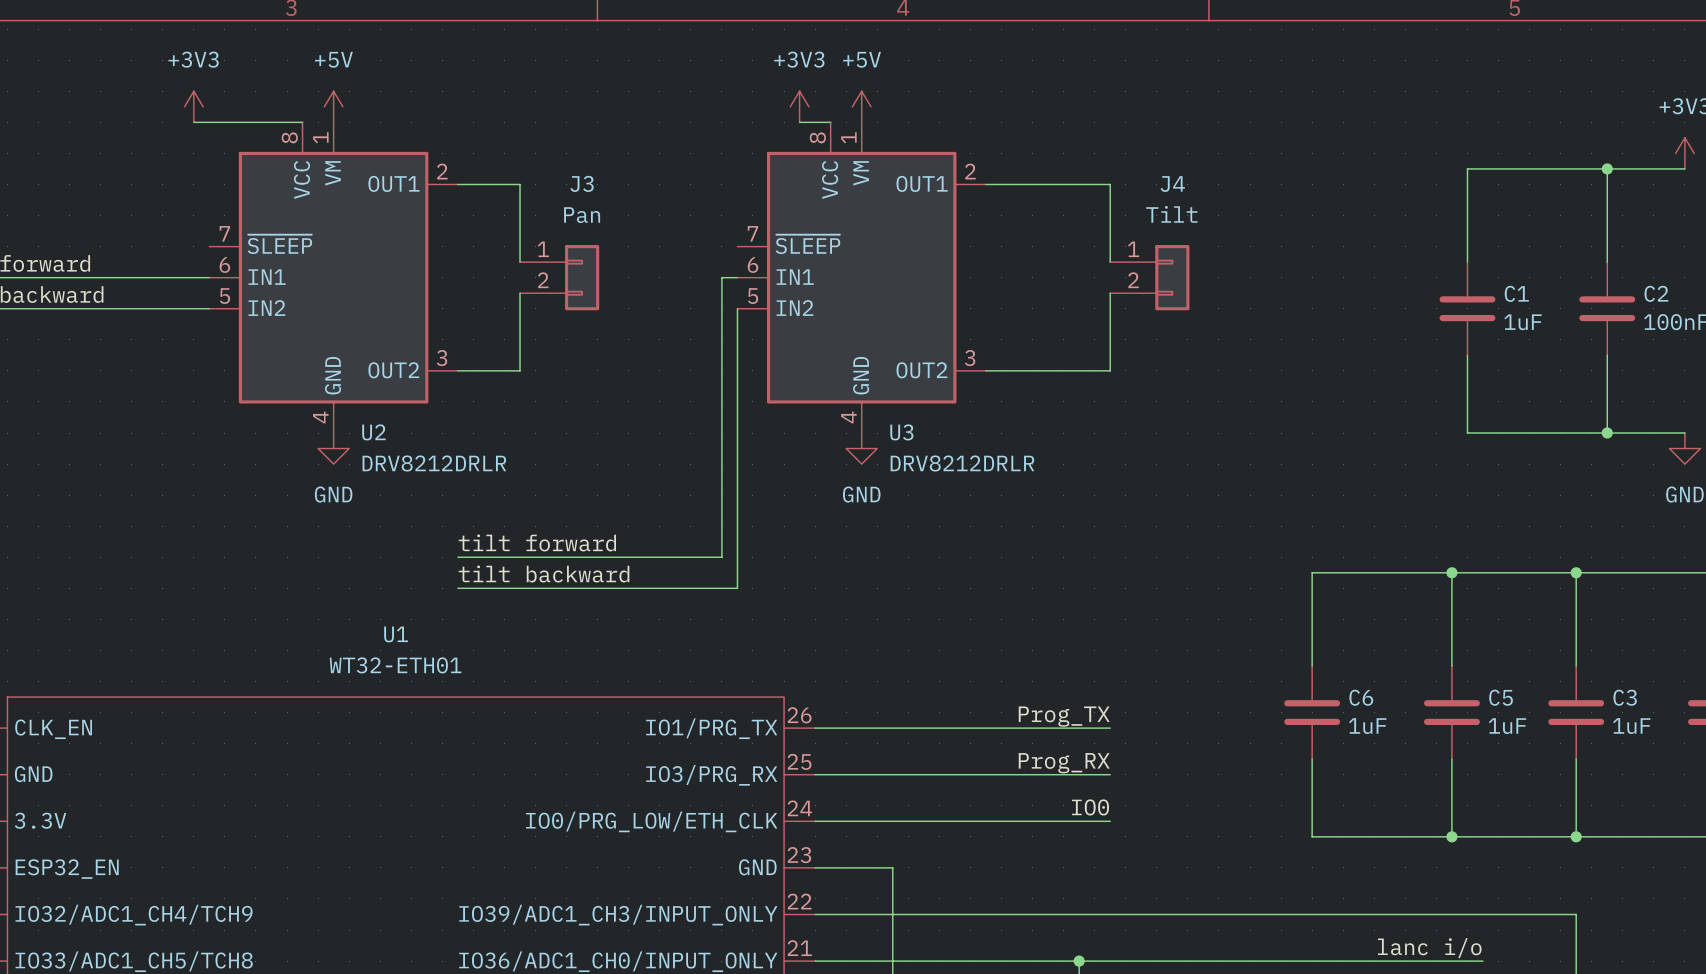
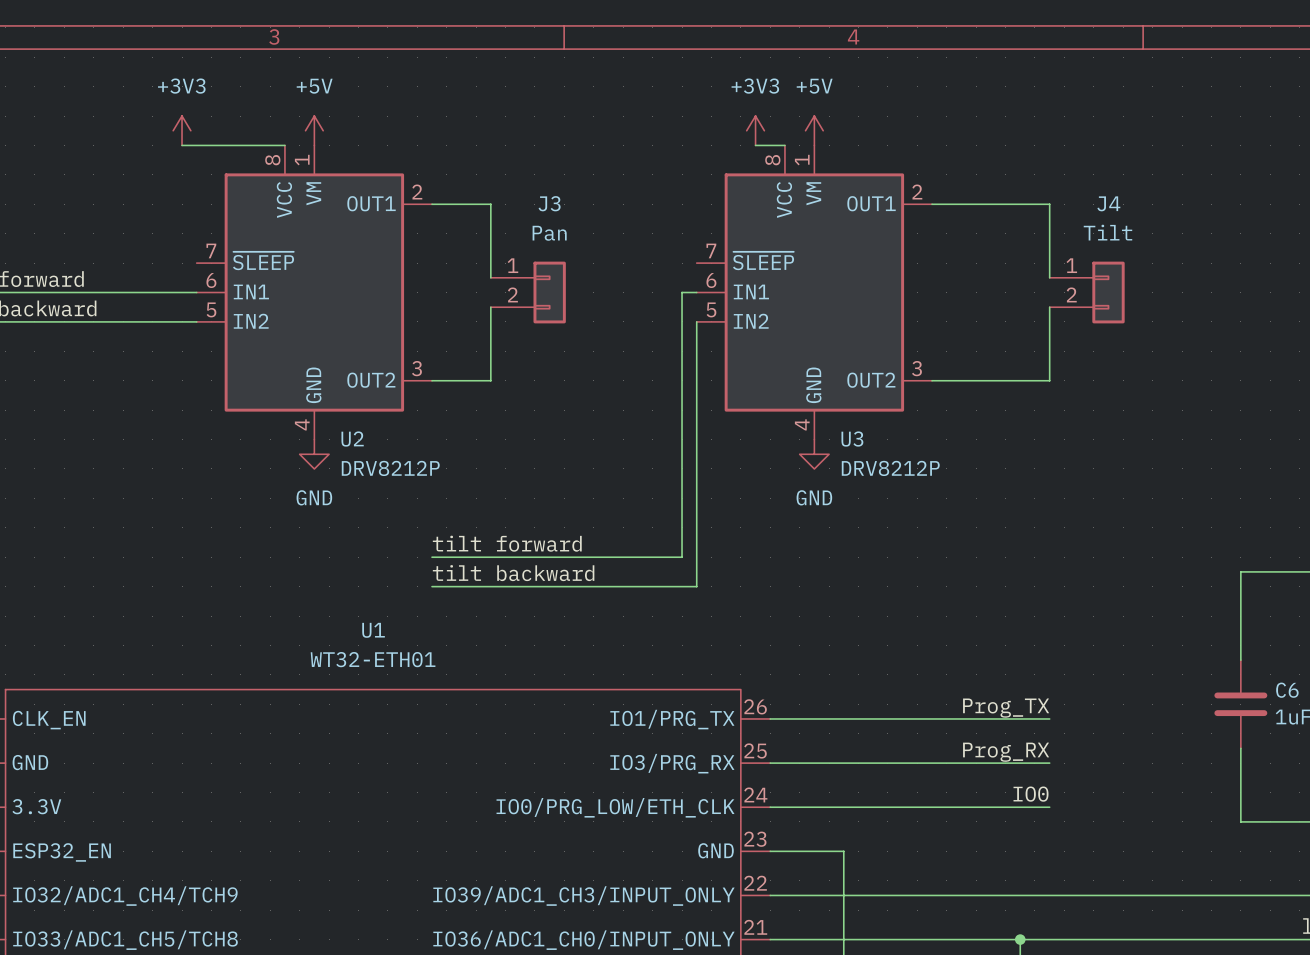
U2 value: DRV8212DRLR (434, 463) -> DRV8212P (390, 468)
U3 value: DRV8212DRLR (962, 463) -> DRV8212P (890, 468)

